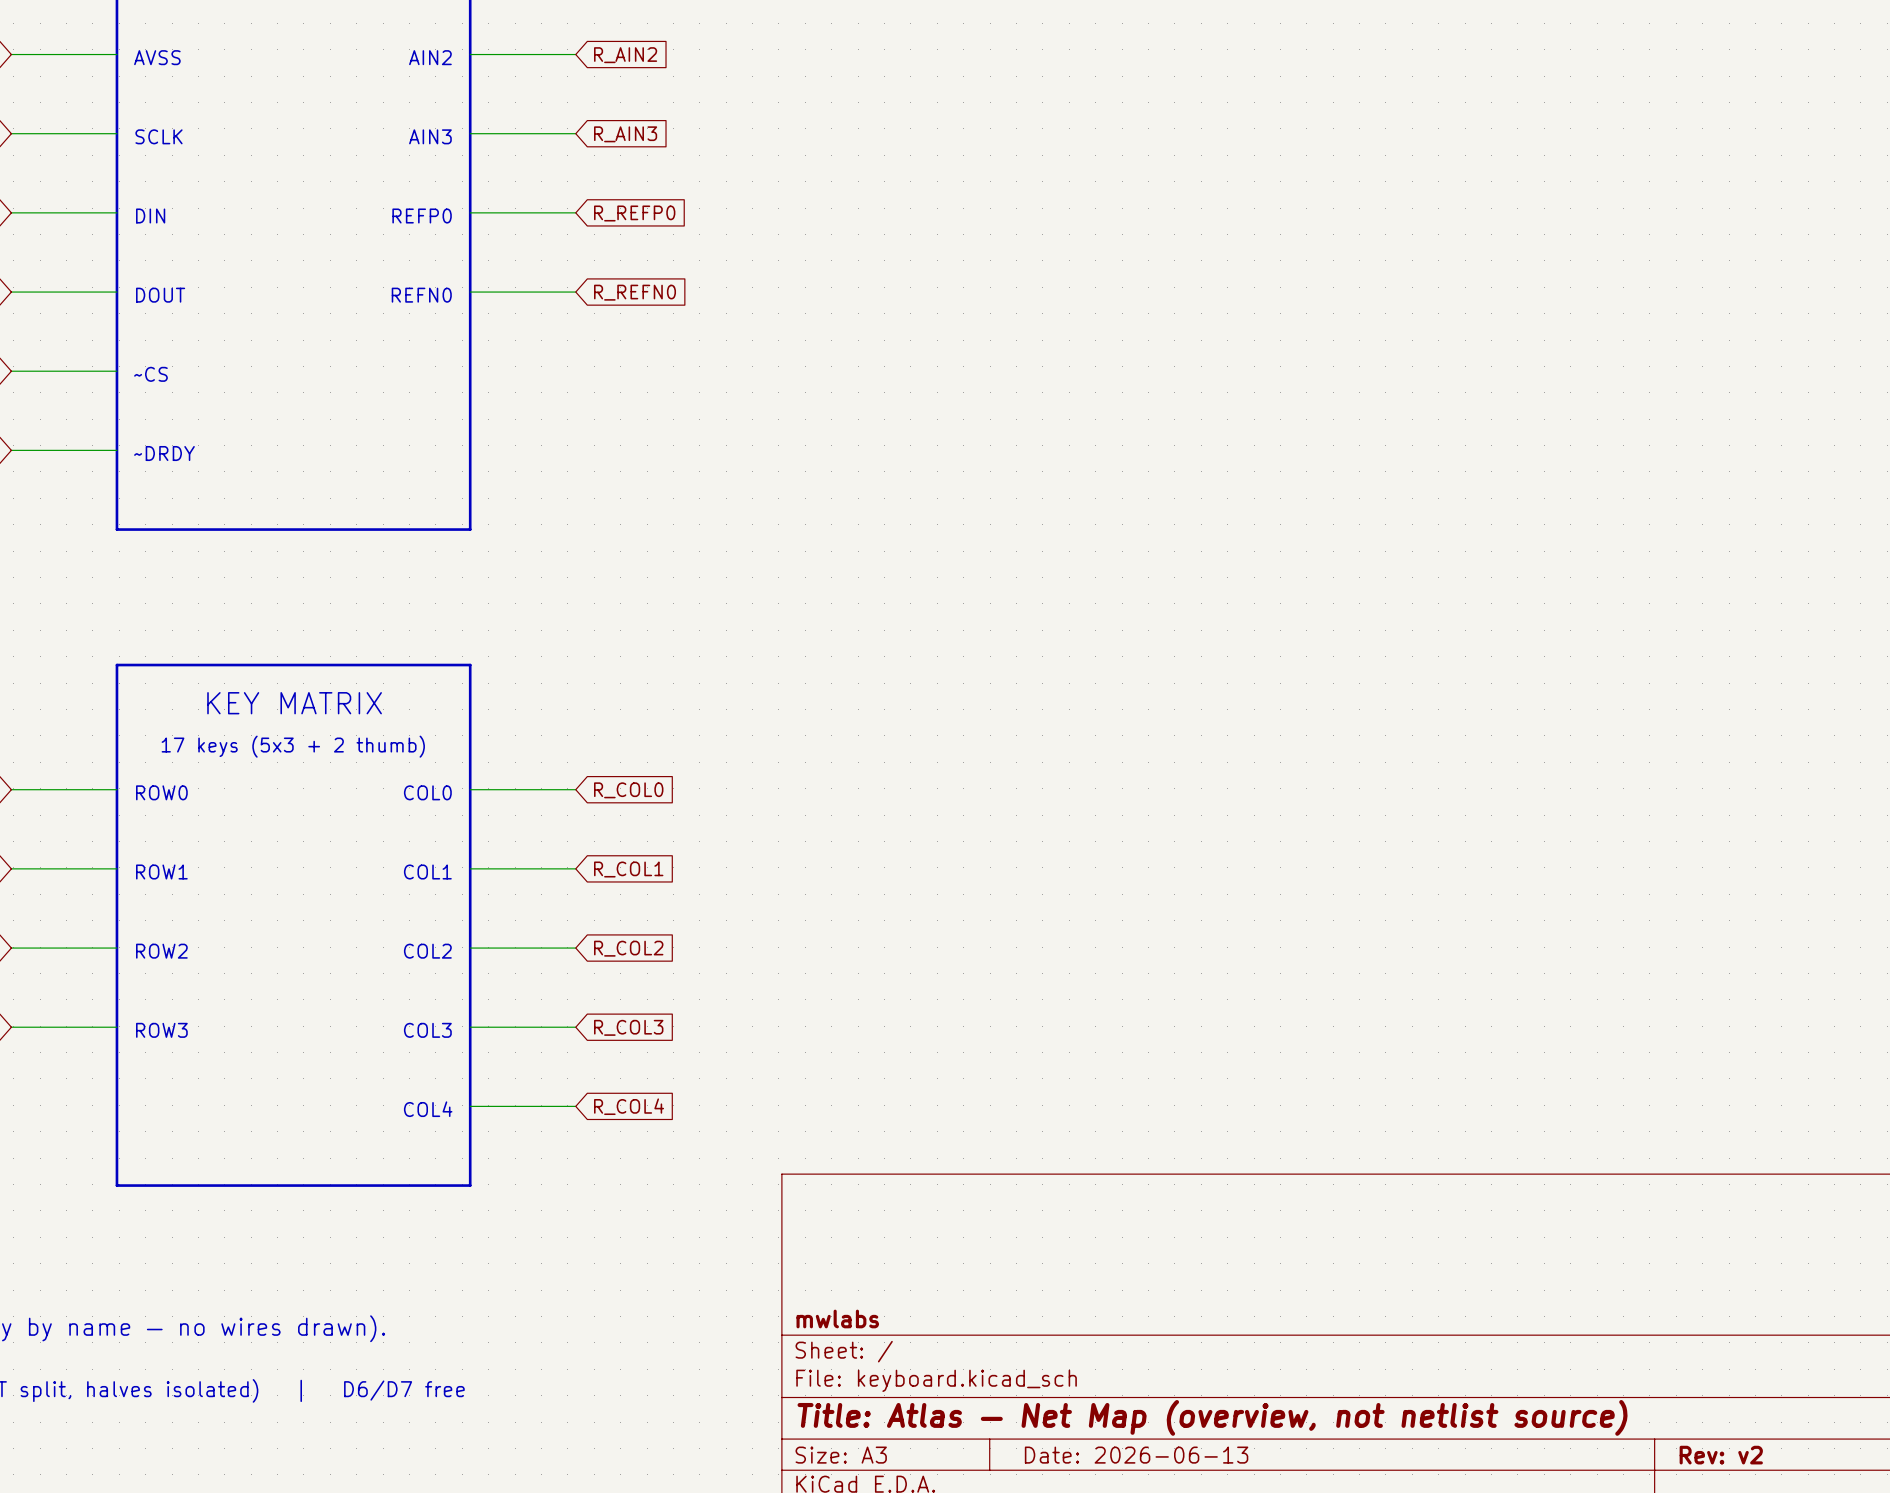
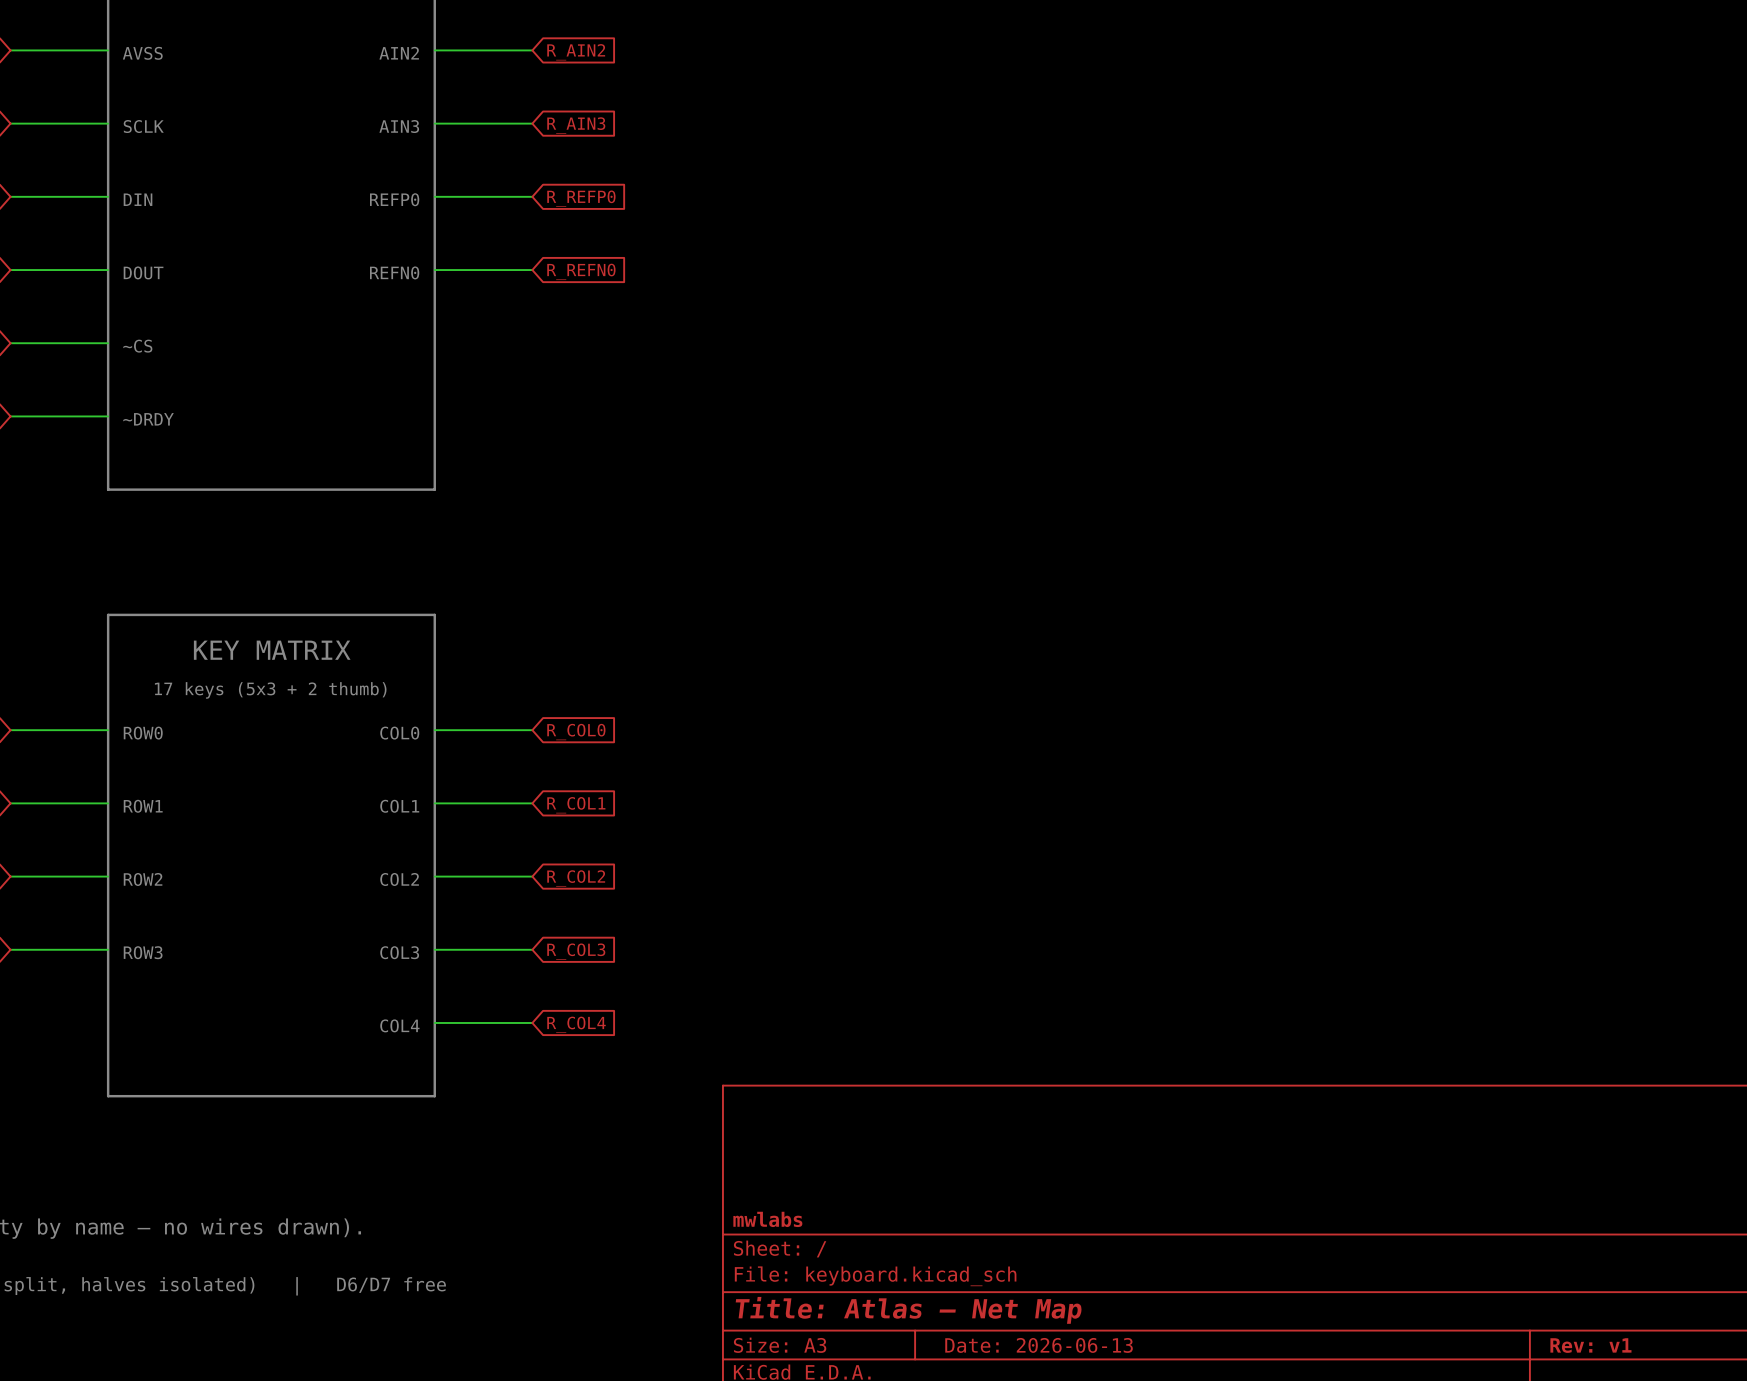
title block: Title: Atlas — Net Map (overview, not netlist source) (1212, 1417) -> Title: Atlas — Net Map (908, 1310)
title block: Rev: v2 (1721, 1455) -> Rev: v1 (1590, 1345)

